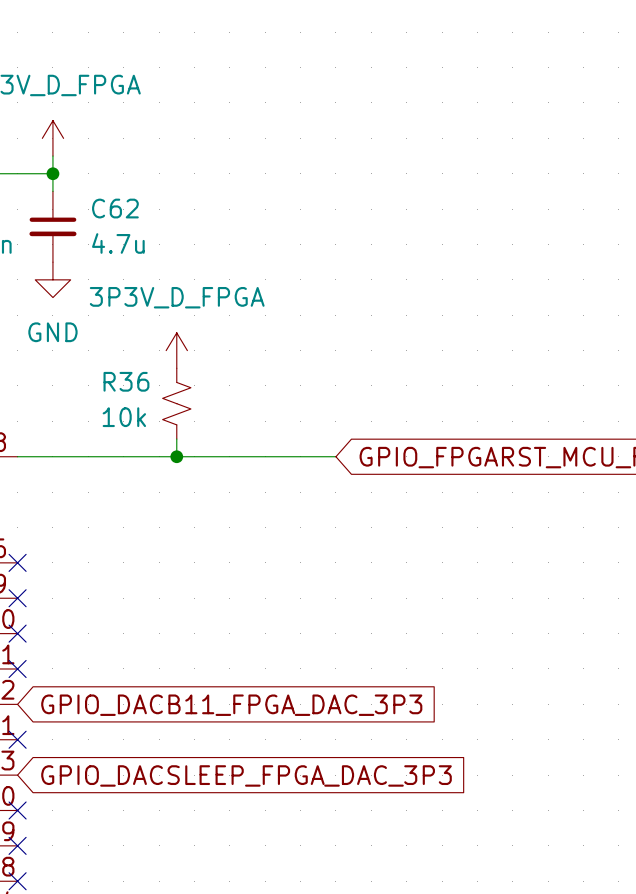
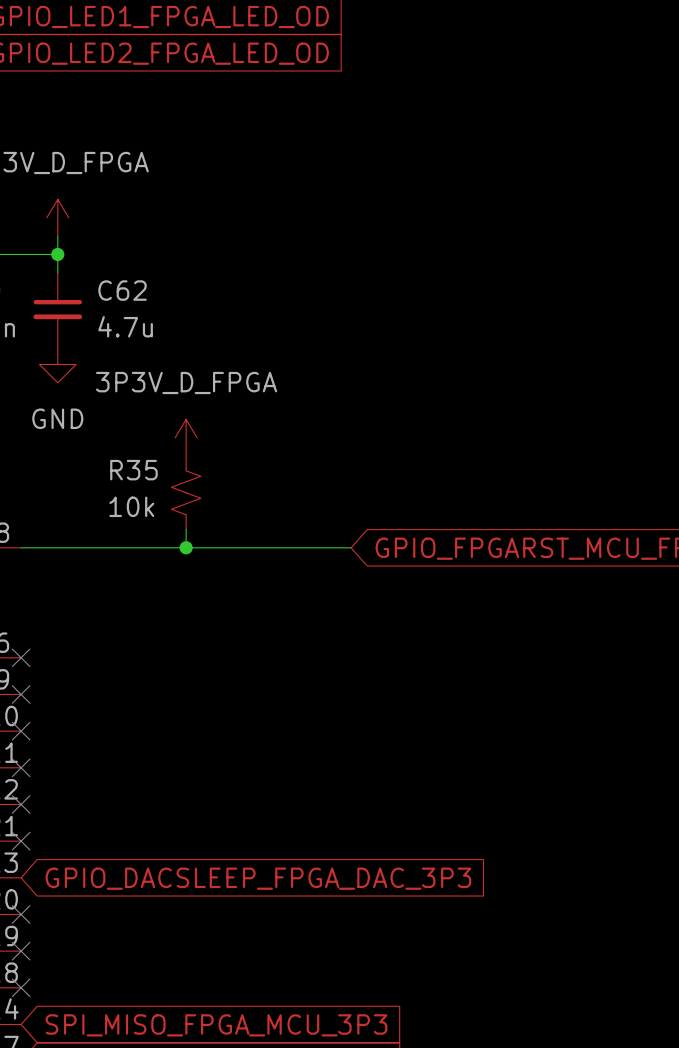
R36 name: R36 (126, 381) -> R35 (133, 470)
no-connect mark: none -> (21, 804)
global label: GPIO_DACB11_FPGA_DAC_3P3 (231, 705) -> none

